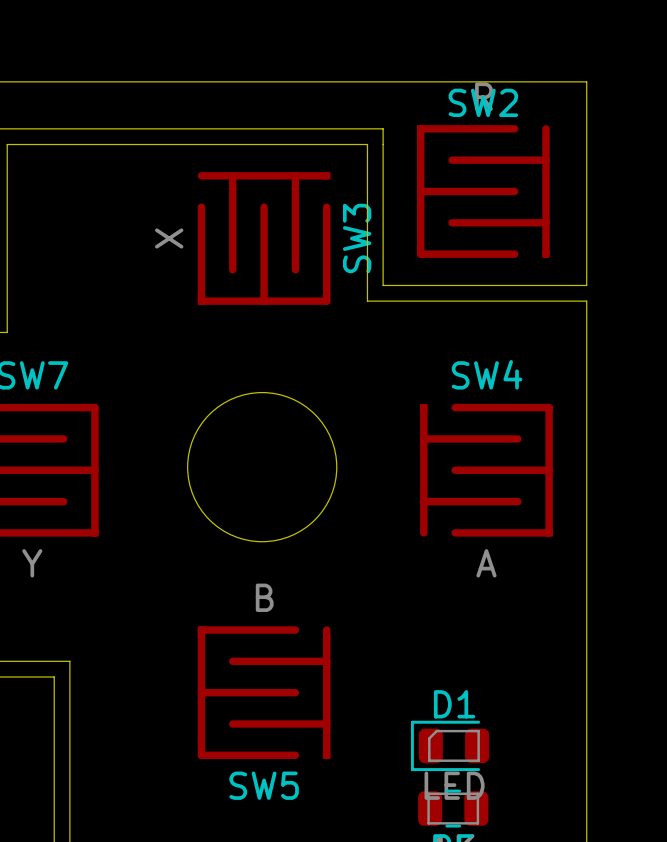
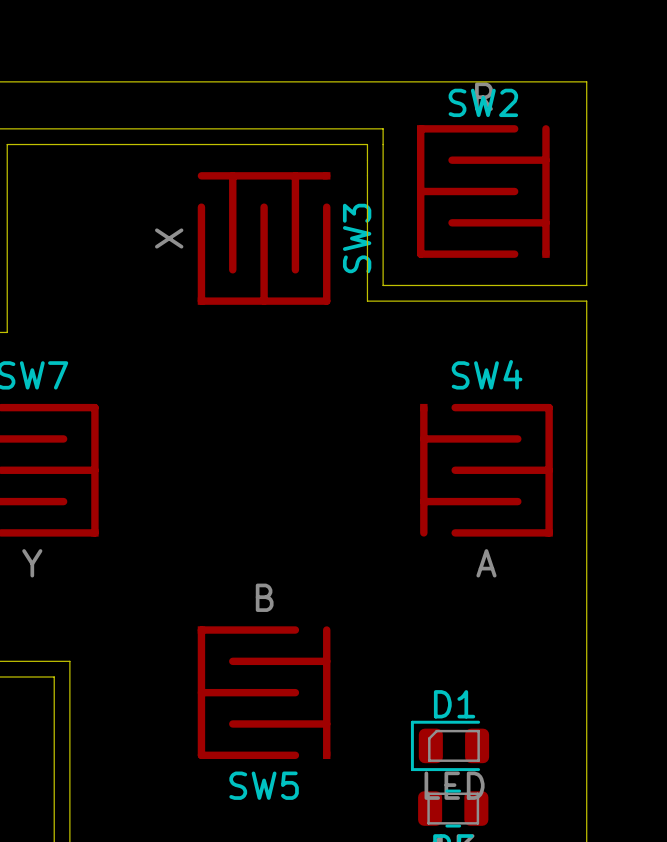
round board edge: [187, 391, 338, 543] -> none

